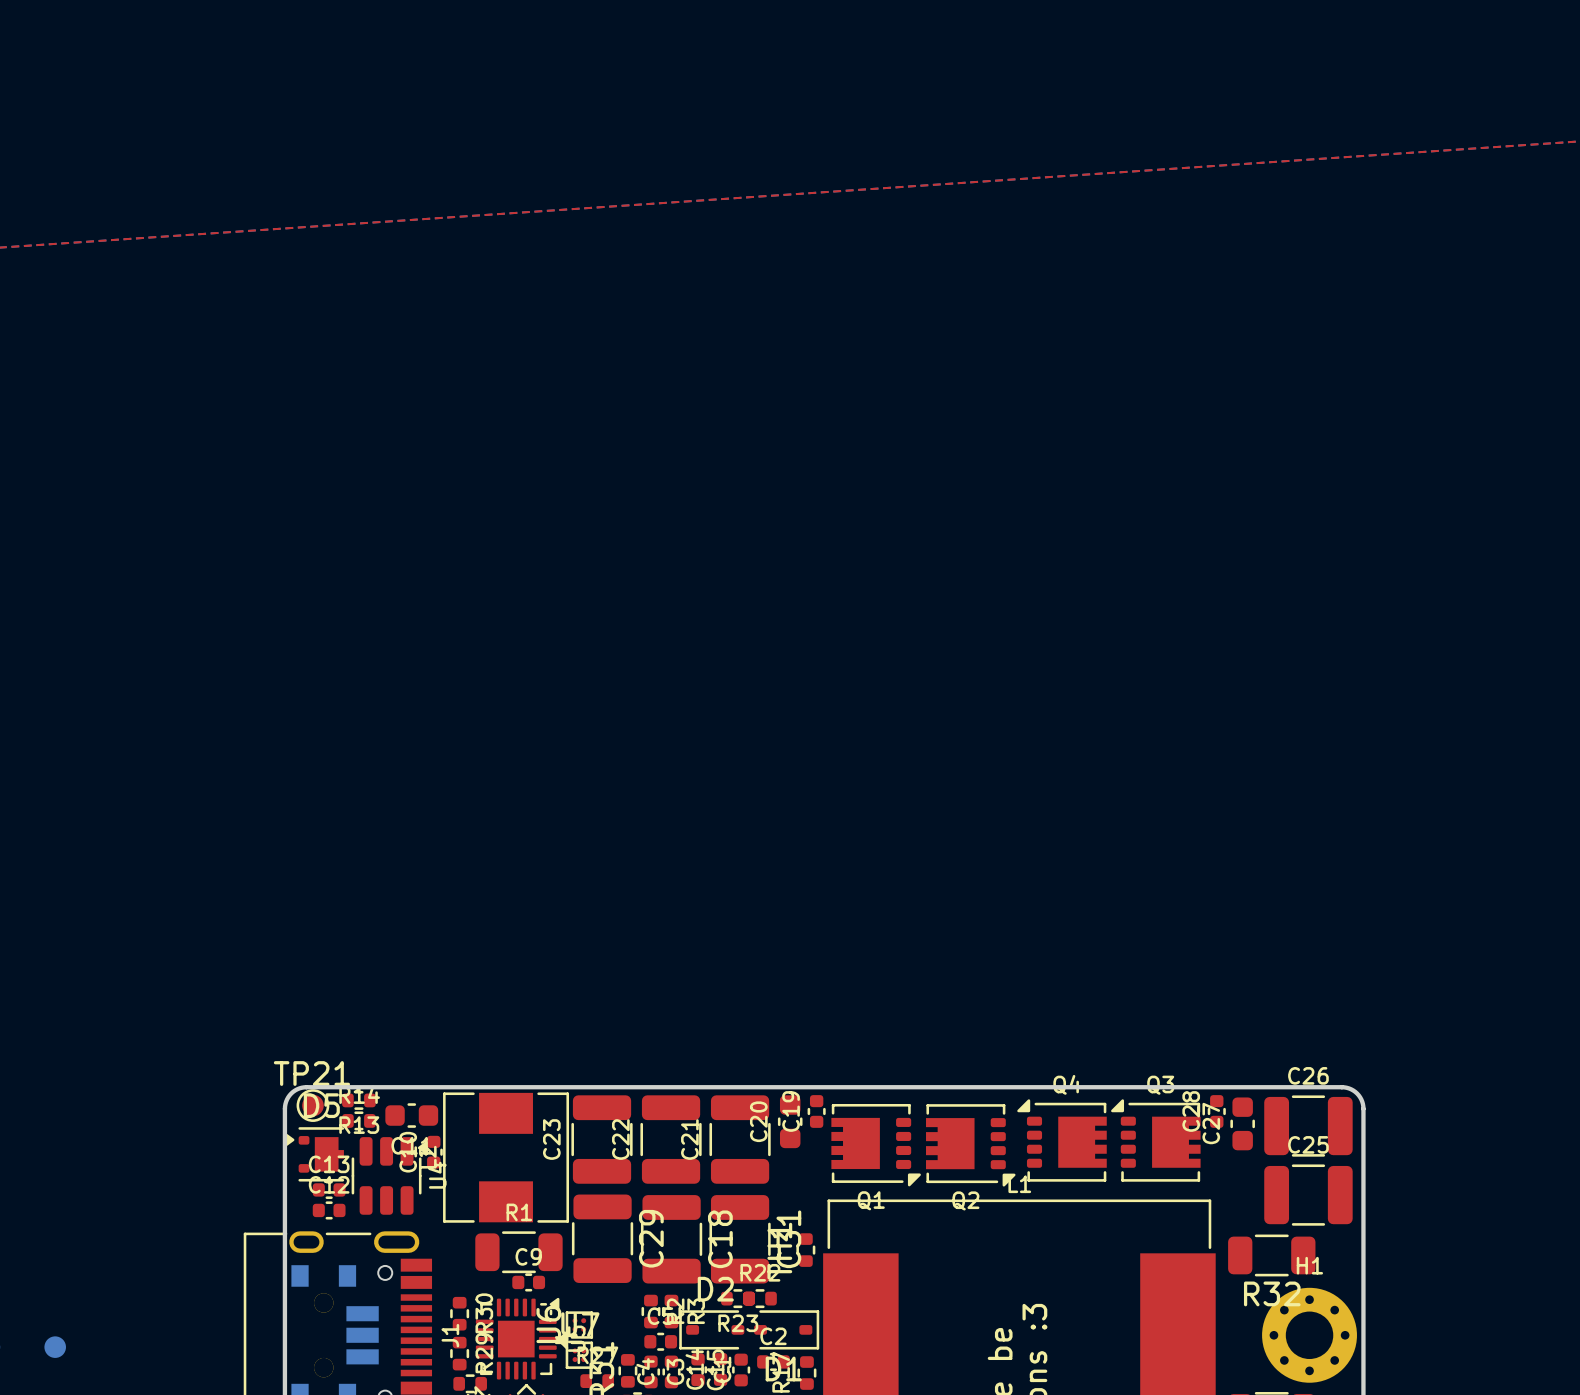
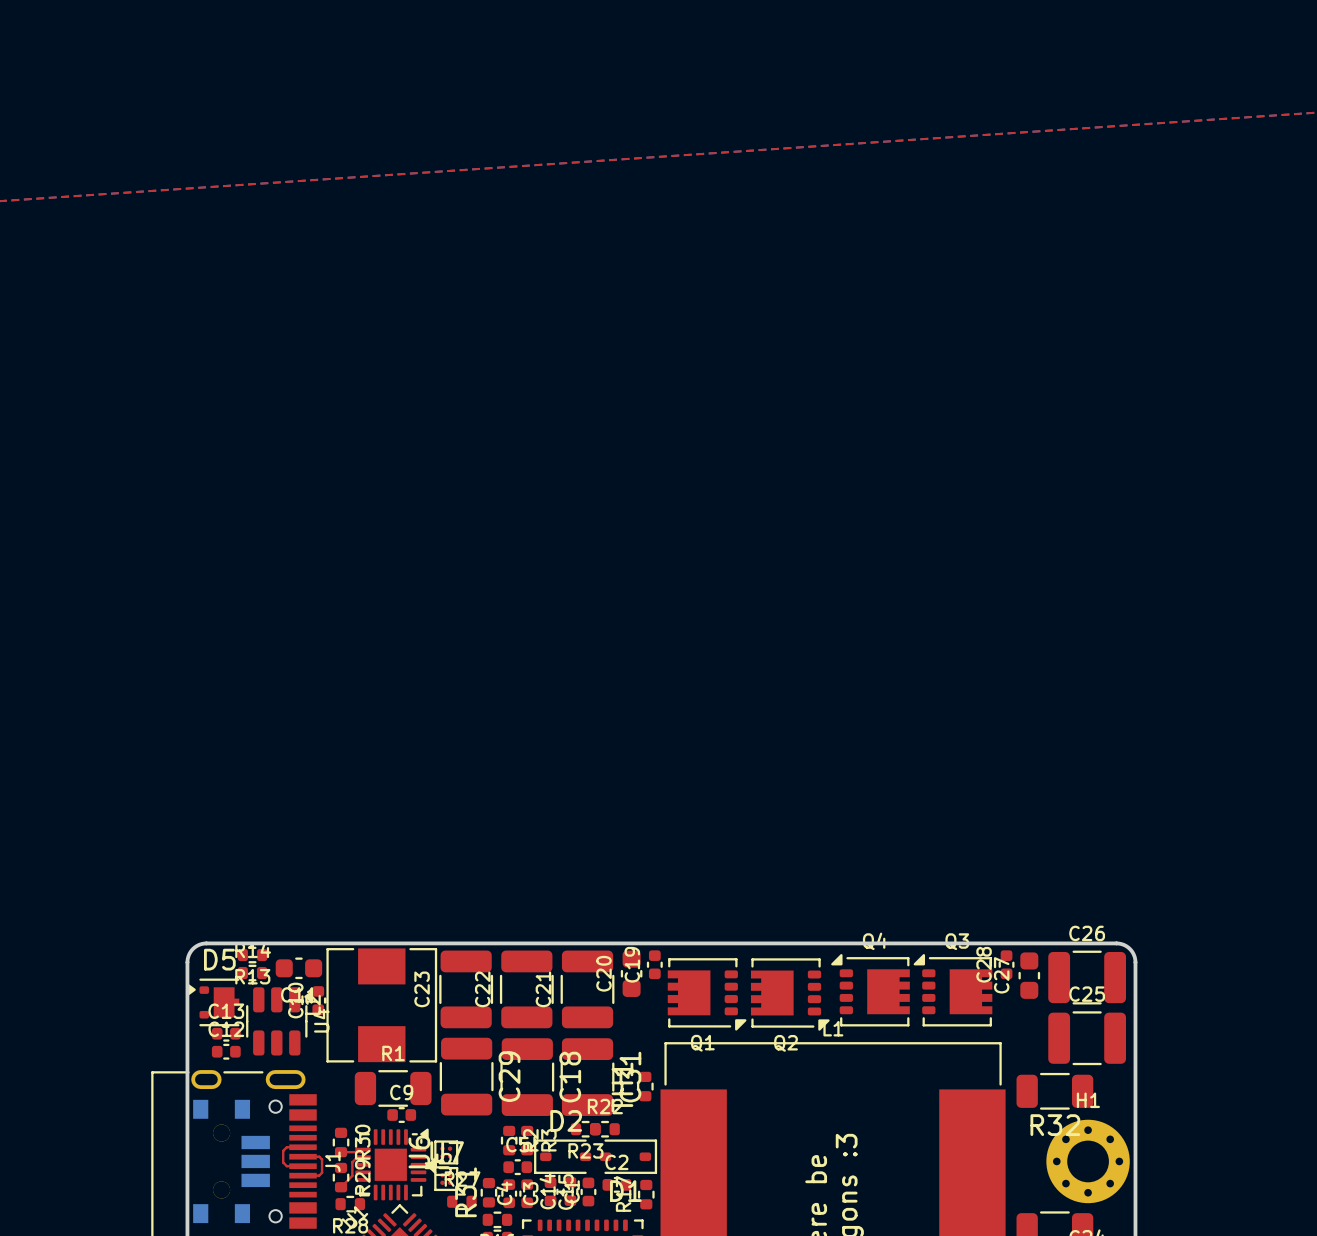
TP21: (312, 1105) -> none
top track: none -> (303, 1147) (286, 1147) (283, 1150) (283, 1162) (286, 1166) (303, 1166)
top track: none -> (363, 1149) (360, 1152) (341, 1152)
top track: none -> (303, 1156) (319, 1156) (322, 1159) (322, 1172) (319, 1175) (303, 1175)
top track: none -> (363, 1157) (357, 1157) (352, 1162) (352, 1175) (341, 1187)

